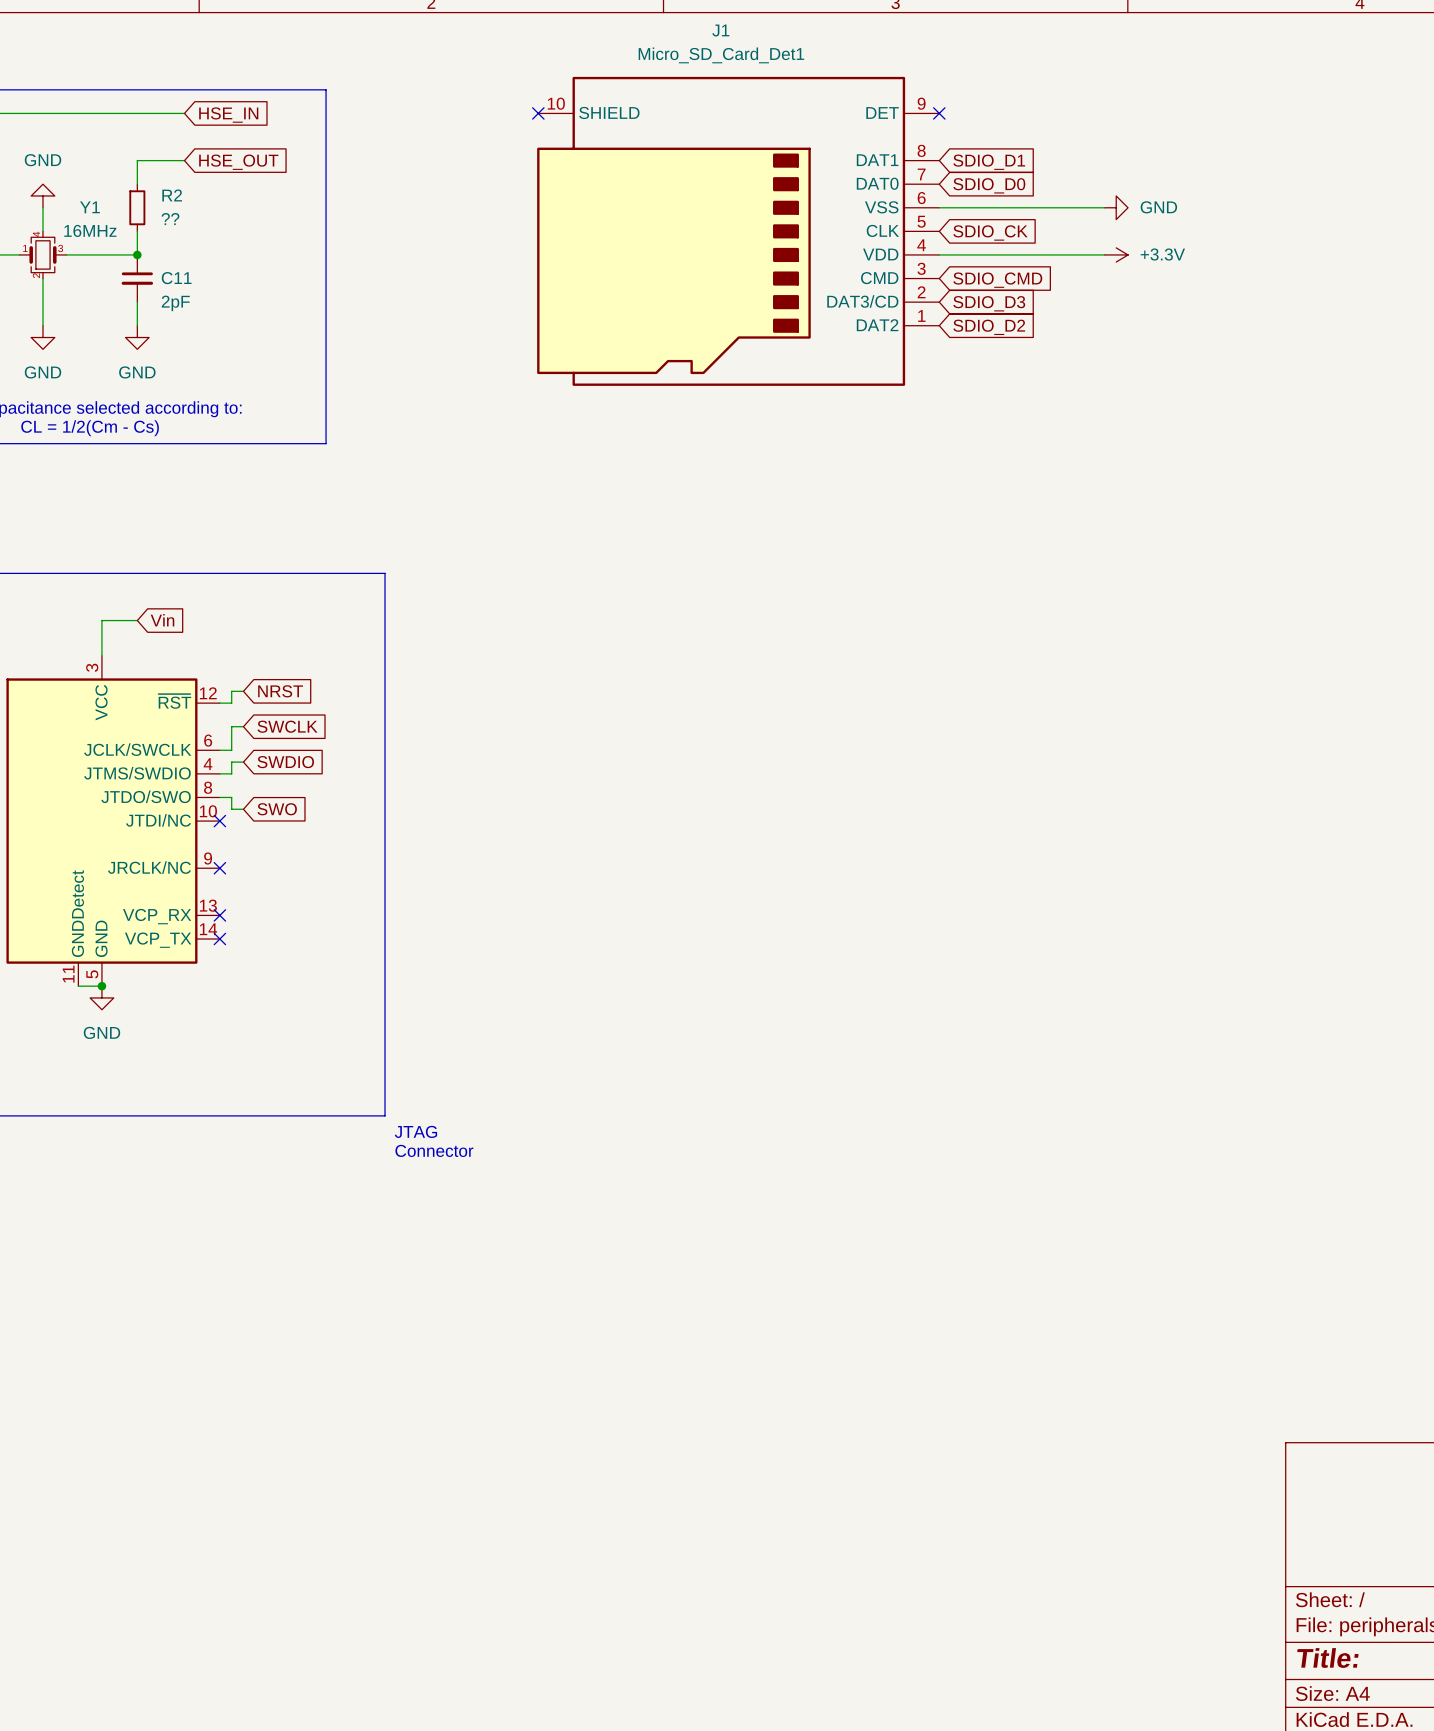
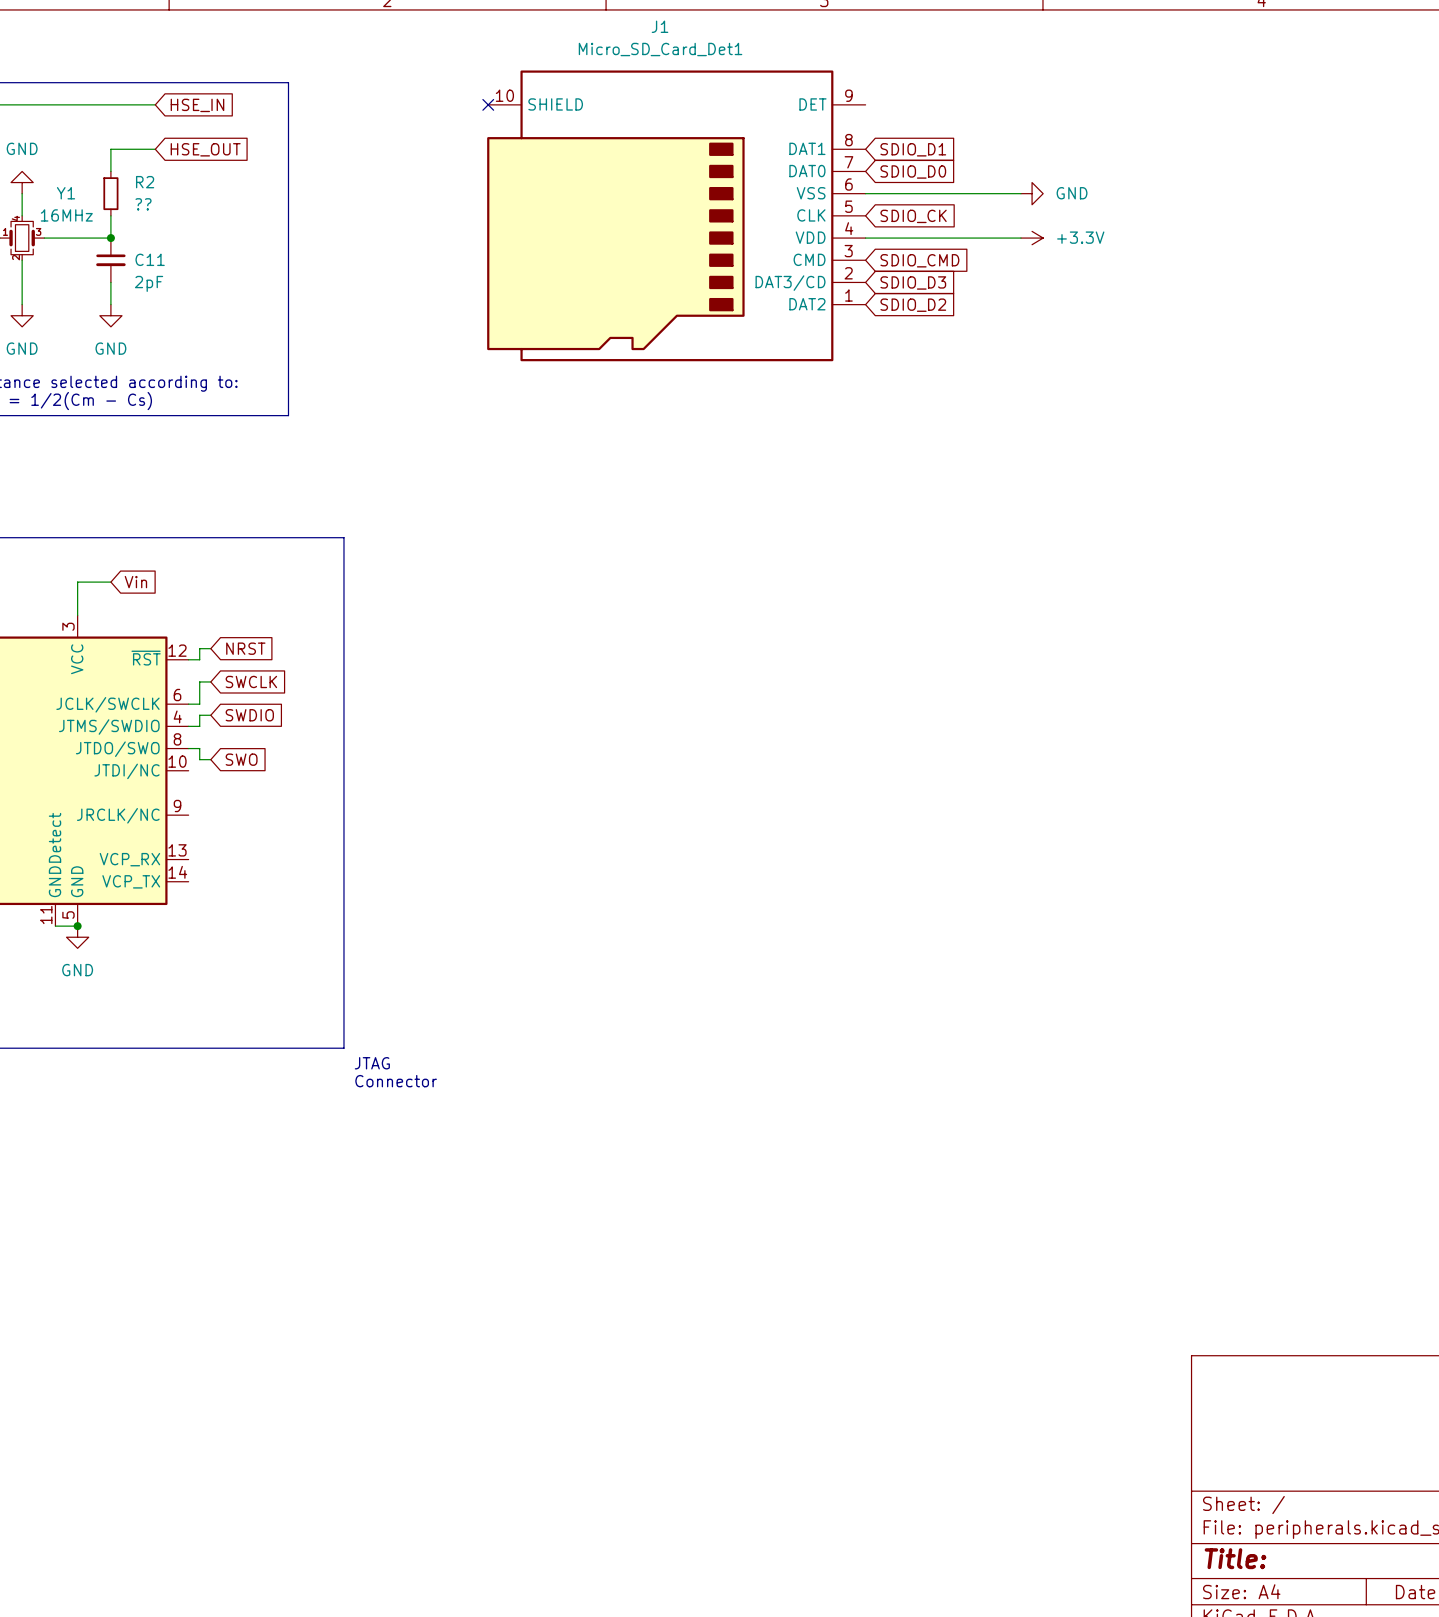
no-connect mark: (939, 113) -> none
no-connect mark: (219, 821) -> none
no-connect mark: (219, 868) -> none
no-connect mark: (219, 915) -> none
no-connect mark: (219, 939) -> none

